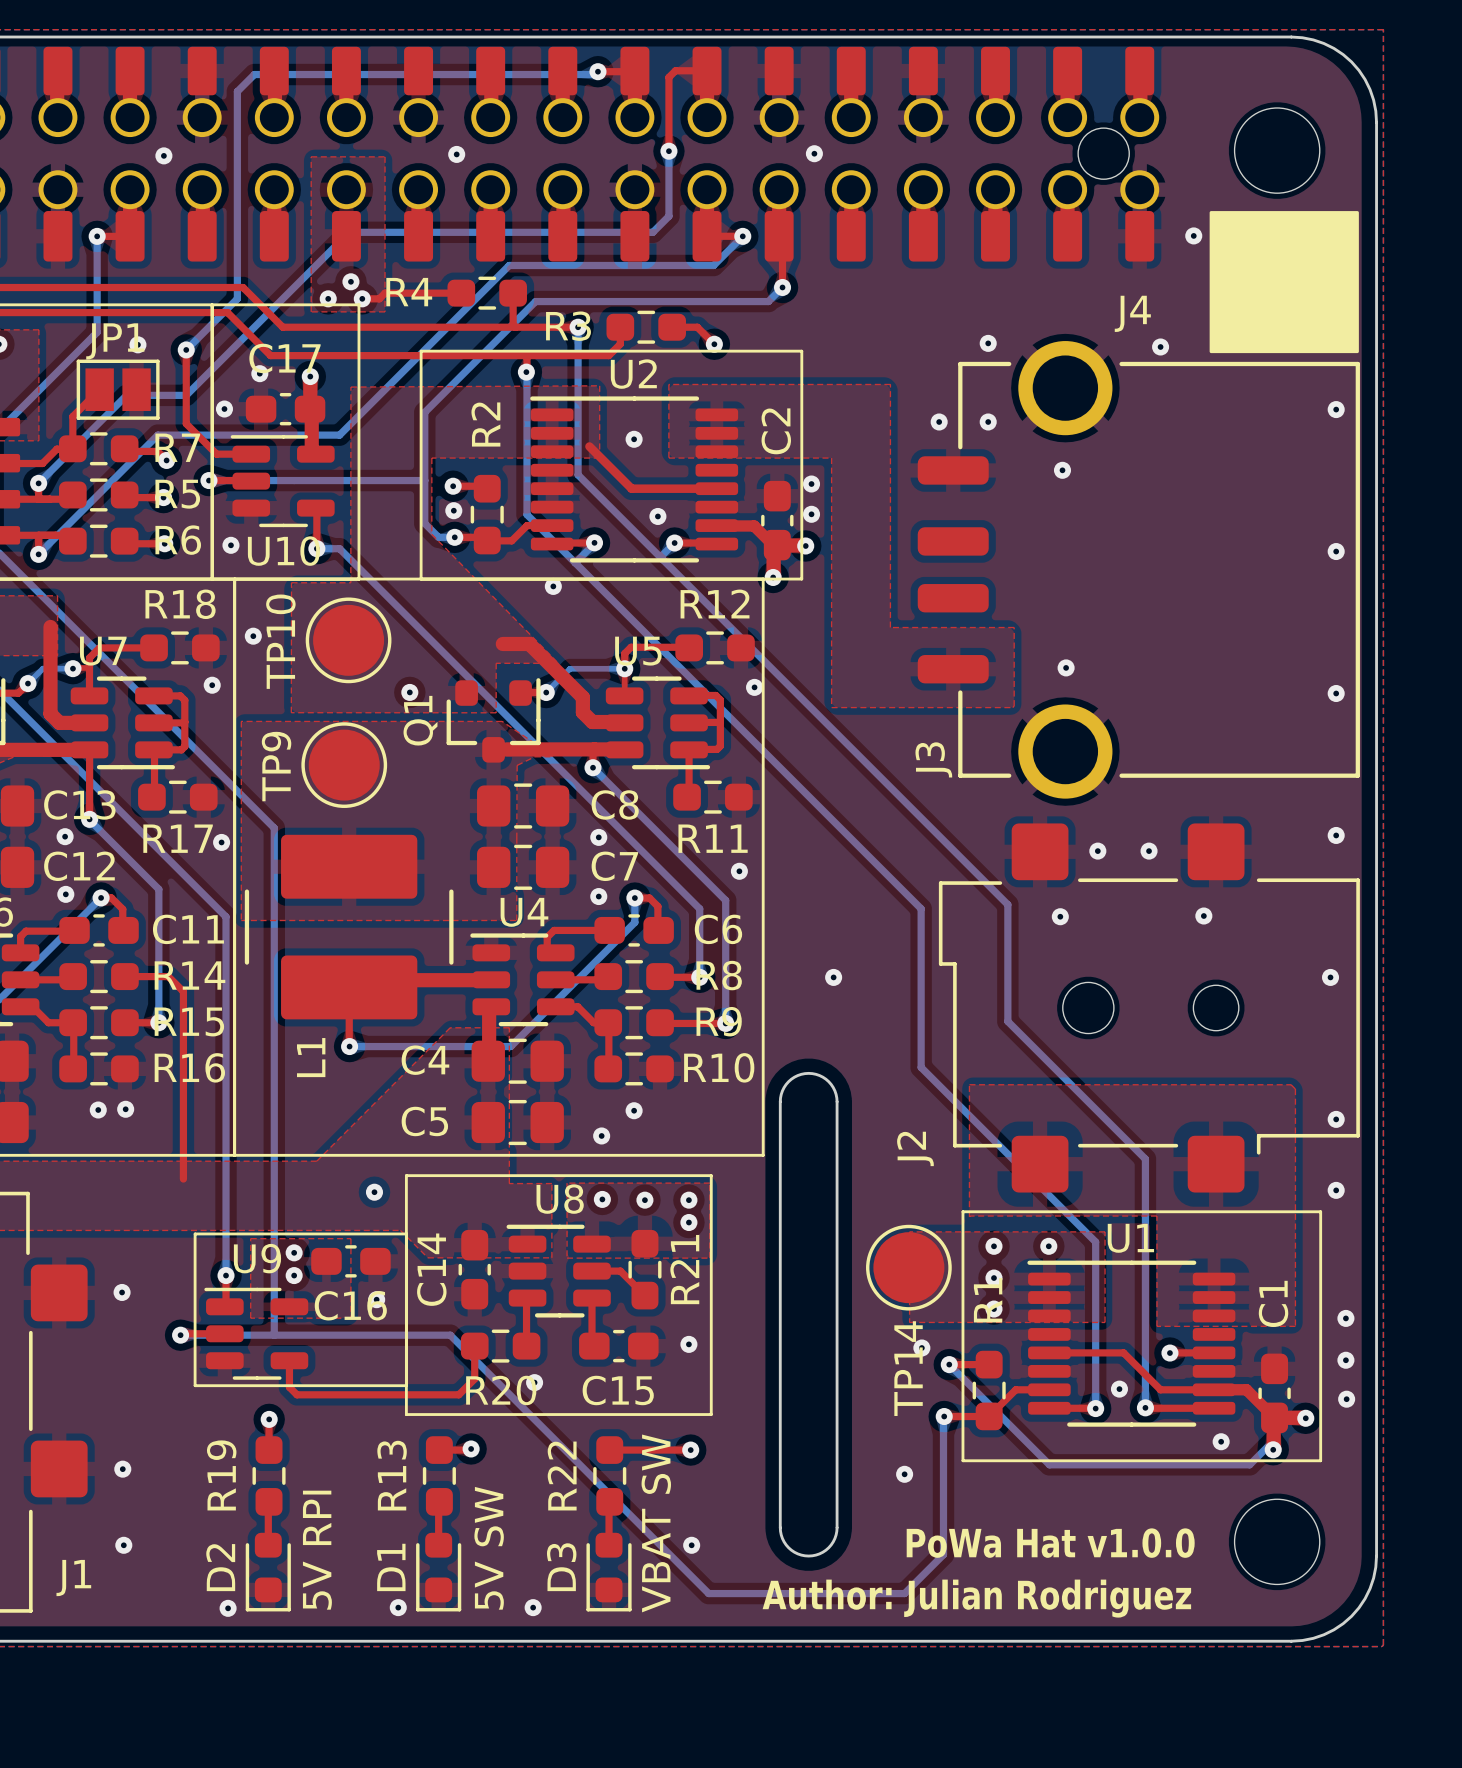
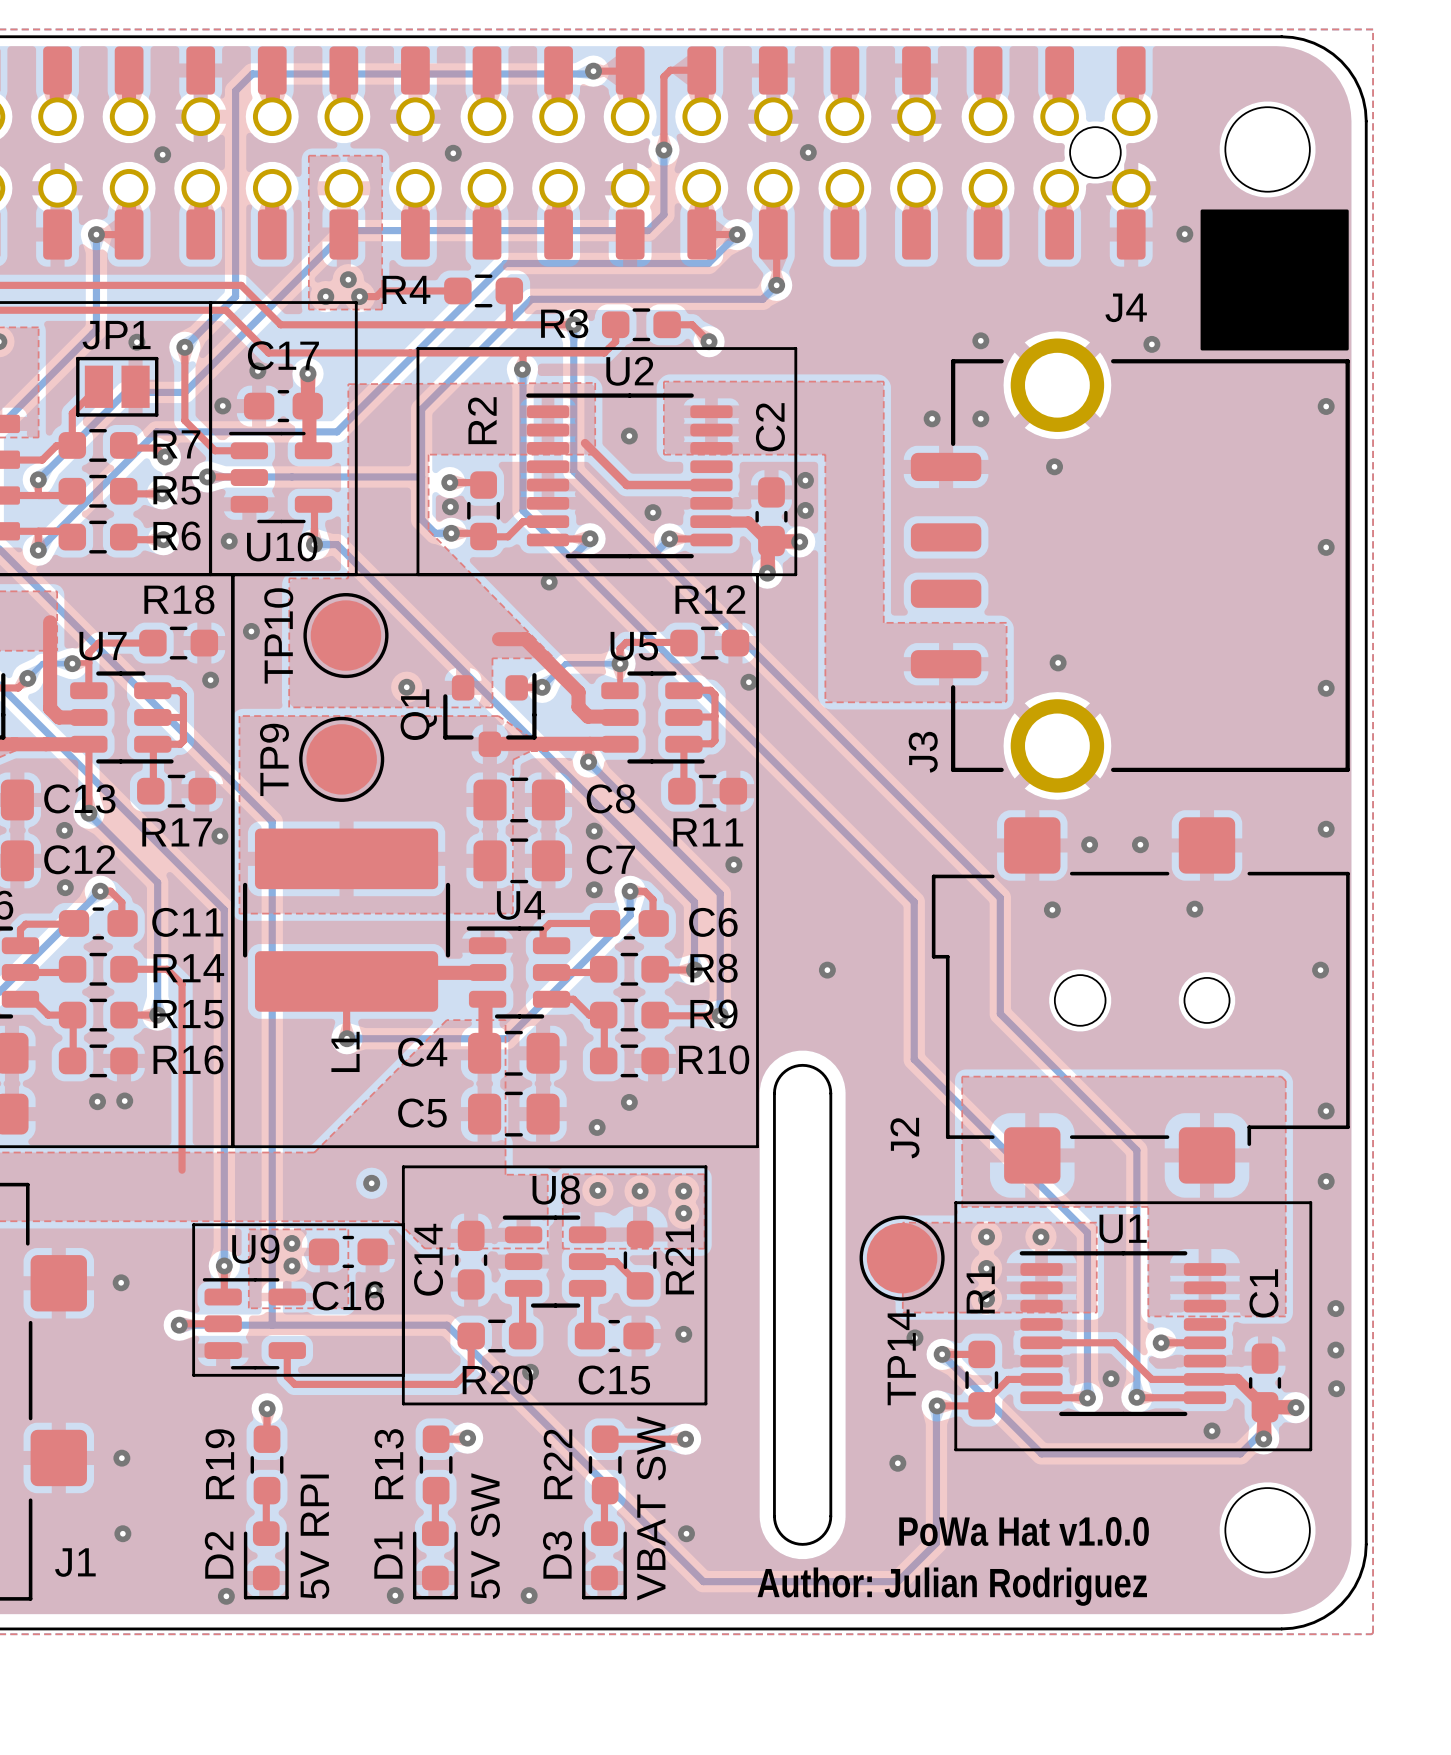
L1 footprint: [244, 834, 454, 1020] -> [242, 828, 451, 1012]
L1 name position: L1 (311, 1057) -> L1 (345, 1051)

